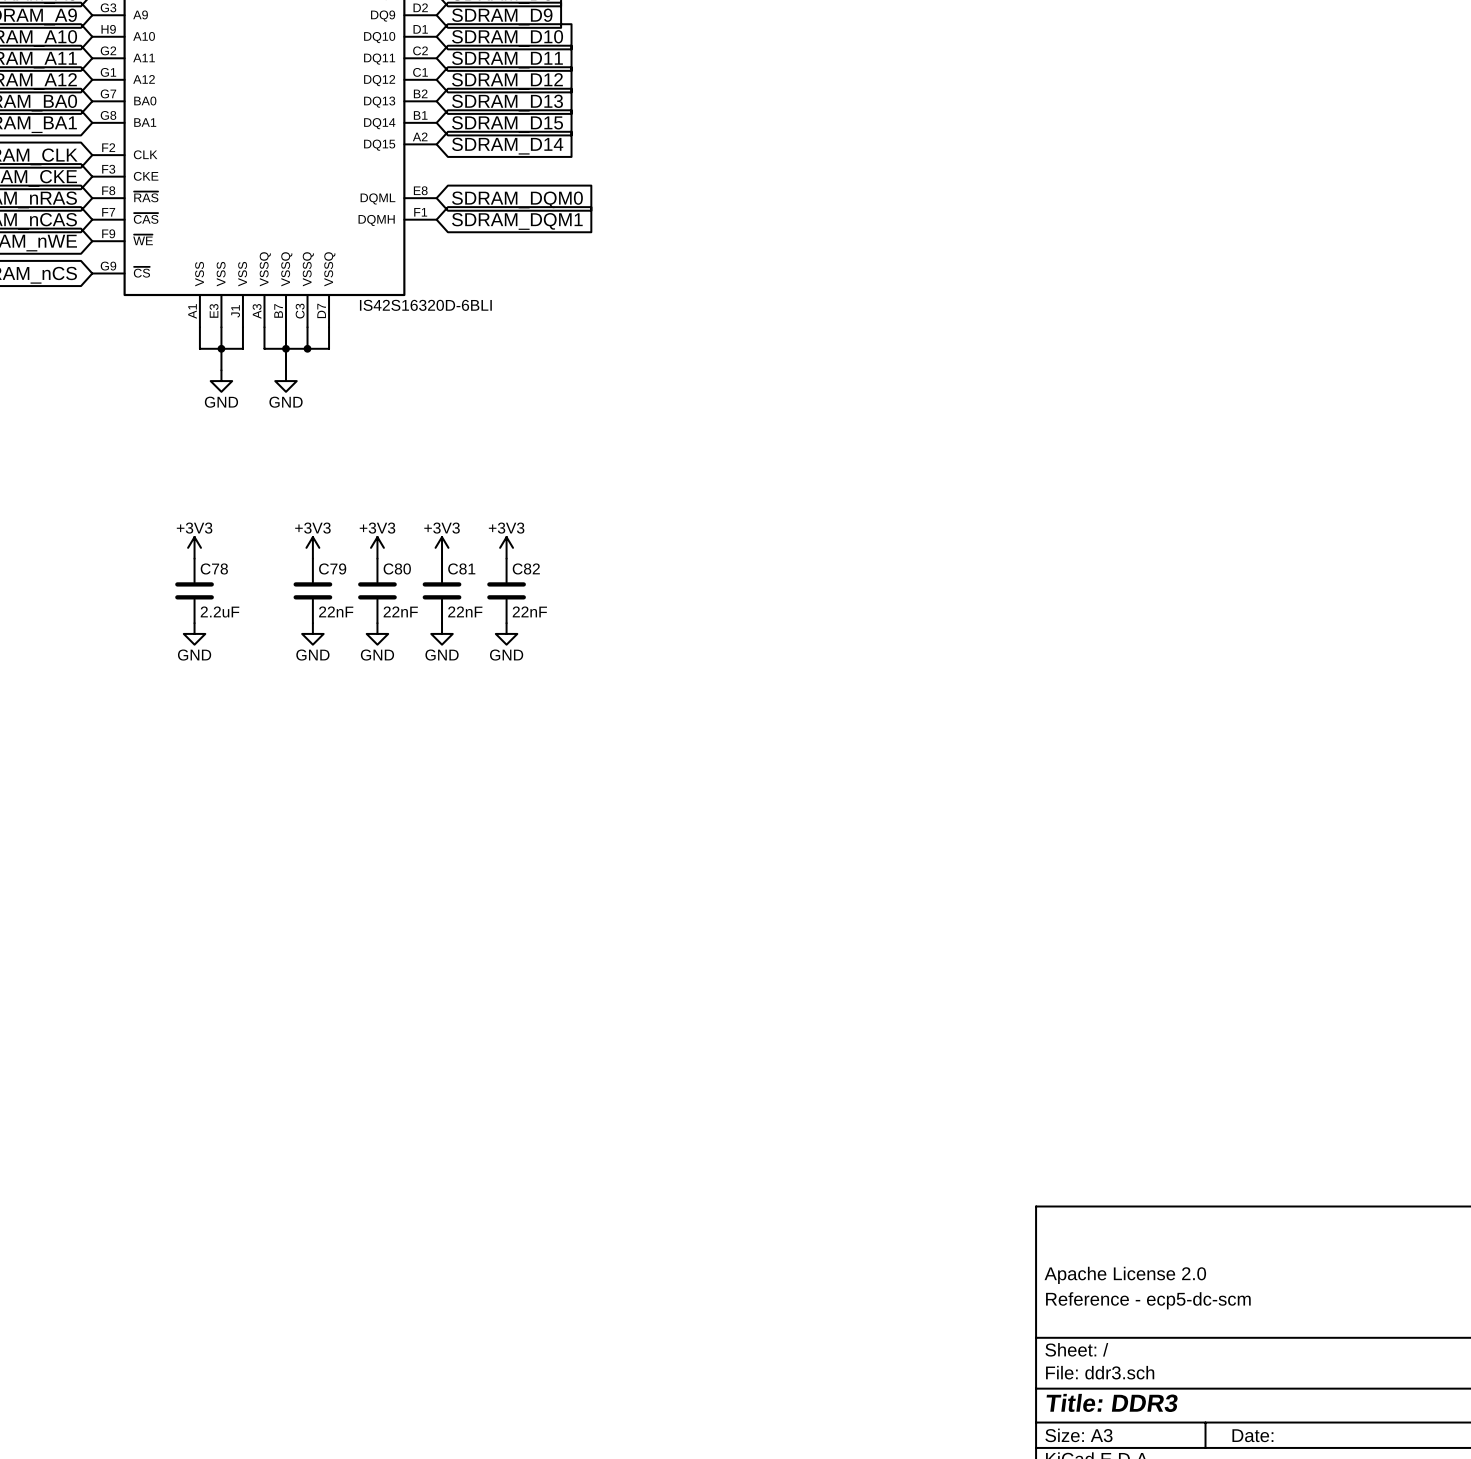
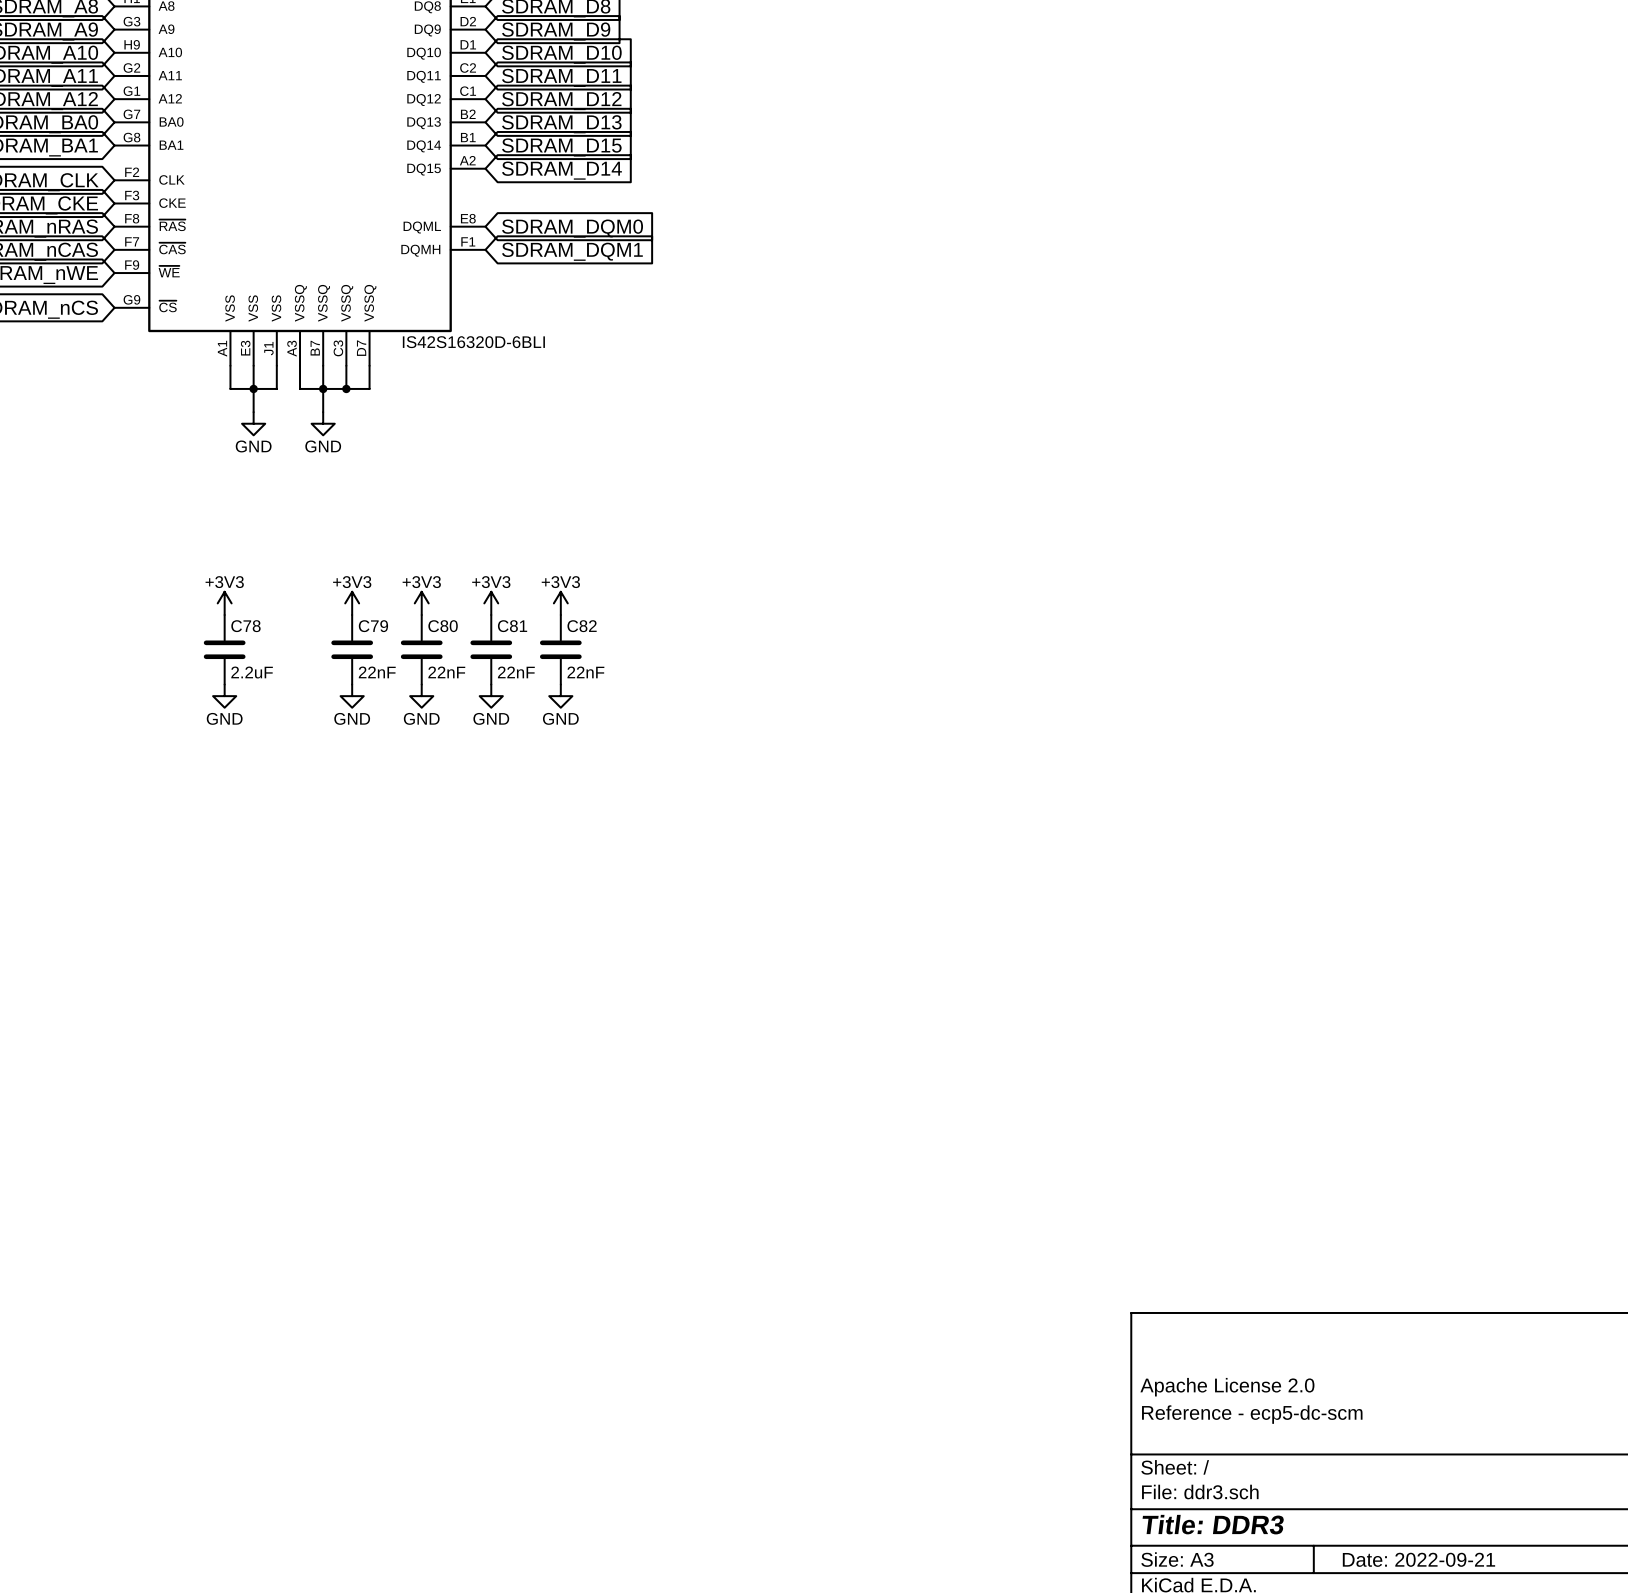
title block: Date: (1252, 1435) -> Date: 2022-09-21 (1418, 1559)

